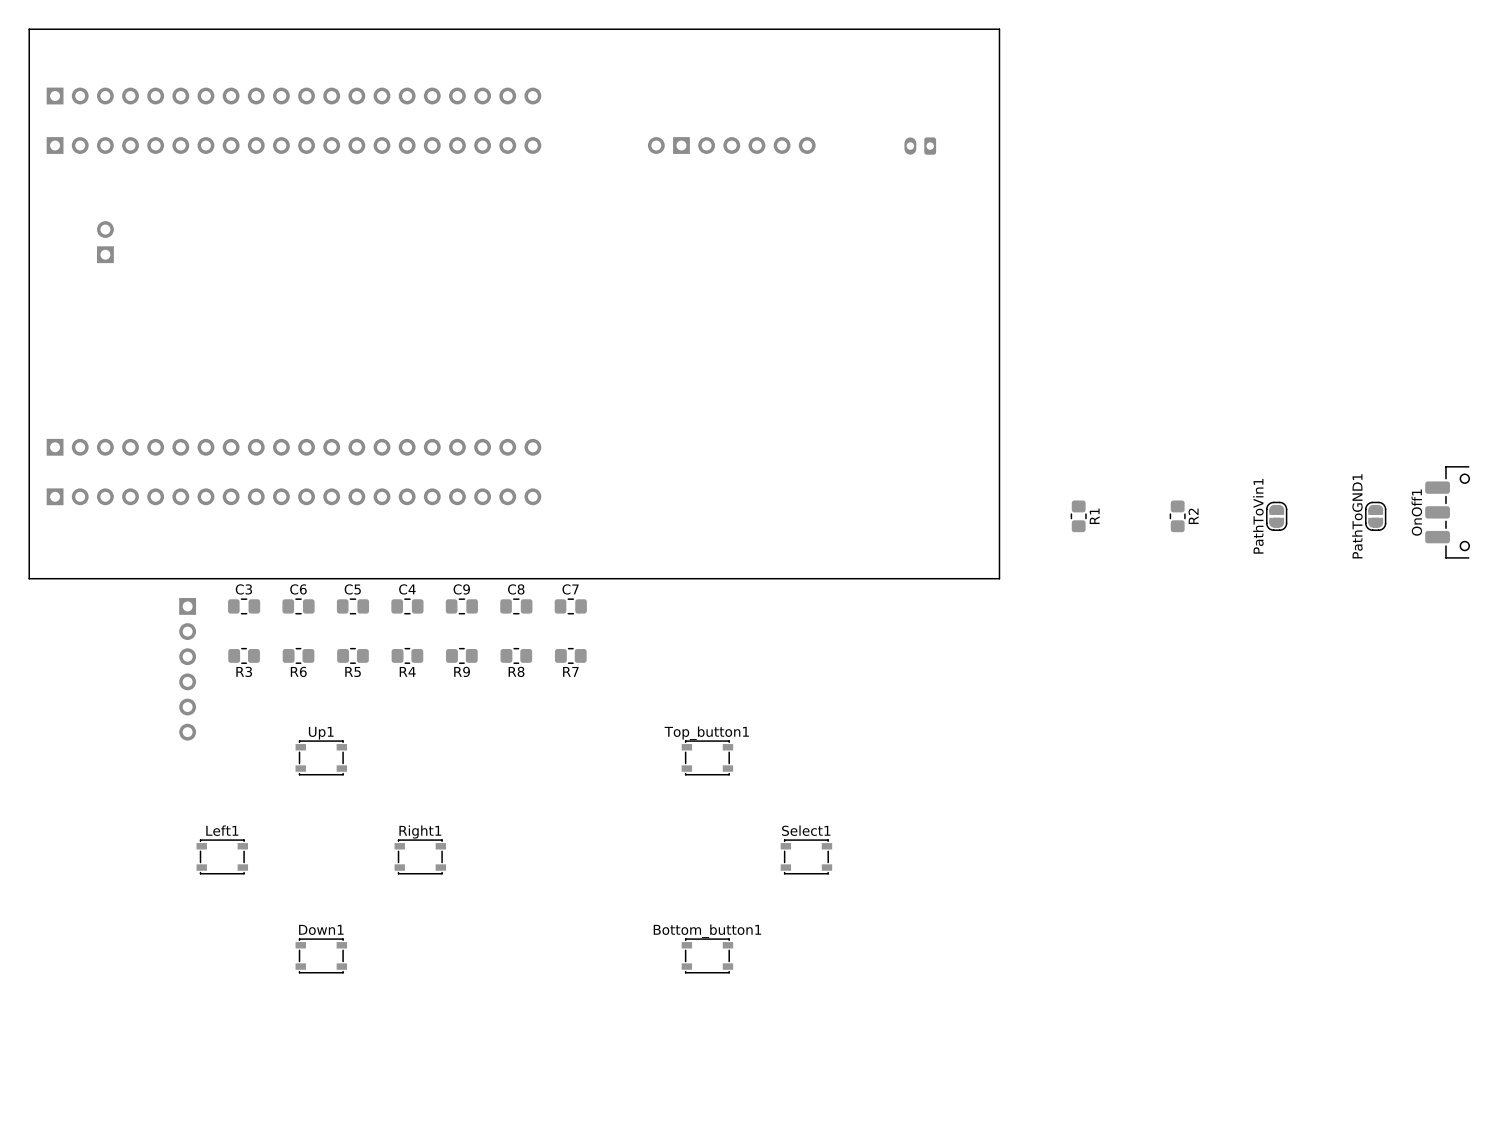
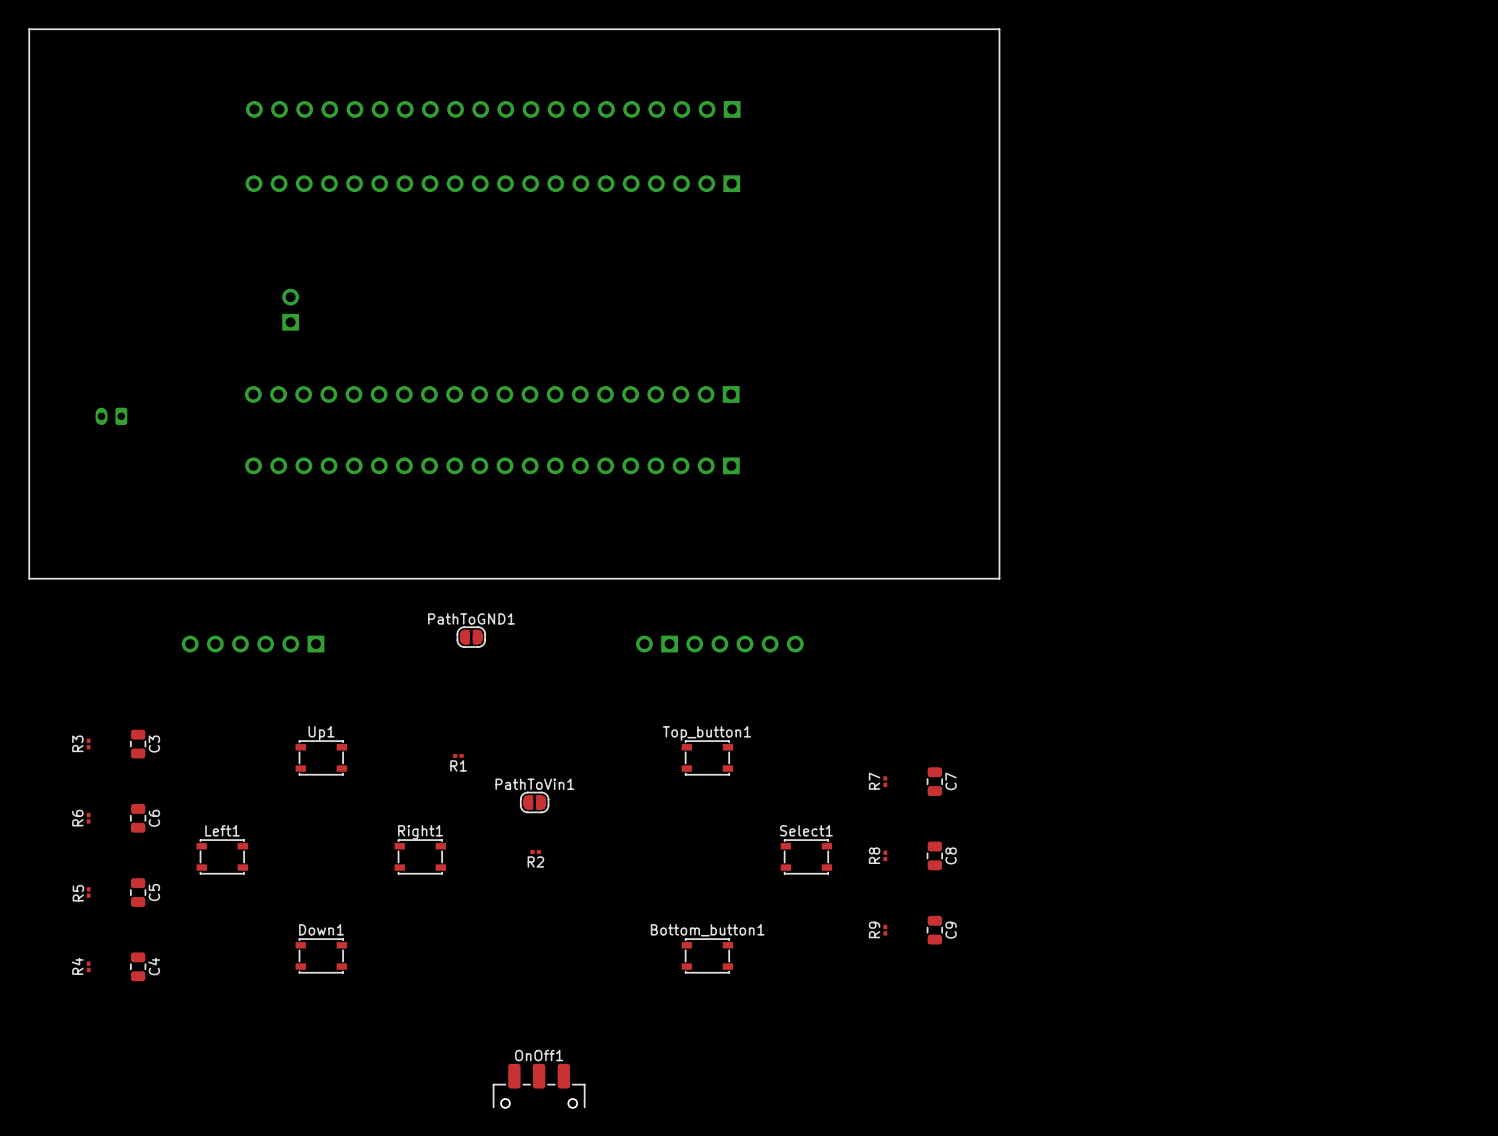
part: (293, 96) -> none
part: none -> (493, 109)
part: (293, 145) -> none
part: (731, 145) -> none
part: (920, 146) -> none
part: none -> (492, 183)
part position: (105, 242) -> (290, 309)
part: none -> (492, 394)
part: none -> (111, 416)
part: (293, 447) -> none
part: none -> (492, 465)
part: (293, 496) -> none
R1 footprint: [1070, 500, 1087, 533] -> [452, 753, 464, 758]
R2 footprint: [1169, 500, 1186, 533] -> [530, 849, 542, 854]
OnOff1 rotation: 0° (1447, 512) -> 90° clockwise (539, 1085)
OnOff1 position: (1447, 512) -> (539, 1085)
PathToVin1 rotation: 0° (1276, 516) -> 90° clockwise (534, 802)
PathToVin1 position: (1276, 516) -> (534, 802)
PathToGND1 rotation: 0° (1375, 516) -> 90° clockwise (471, 637)
PathToGND1 position: (1375, 516) -> (471, 637)
C3 name position: C3 (243, 589) -> C3 (154, 744)
C6 name position: C6 (298, 589) -> C6 (154, 818)
C5 name position: C5 (352, 589) -> C5 (154, 892)
C4 name position: C4 (407, 589) -> C4 (154, 966)
C9 name position: C9 (461, 589) -> C9 (951, 930)
C8 name position: C8 (516, 589) -> C8 (951, 855)
C7 name position: C7 (570, 589) -> C7 (951, 781)
C3 footprint: [227, 598, 261, 615] -> [130, 729, 147, 759]
C6 footprint: [282, 598, 315, 615] -> [130, 803, 147, 833]
C5 footprint: [336, 598, 370, 615] -> [130, 878, 147, 907]
C4 footprint: [391, 598, 424, 615] -> [130, 952, 147, 982]
C9 footprint: [445, 598, 478, 615] -> [926, 915, 943, 945]
C8 footprint: [500, 598, 533, 615] -> [926, 841, 943, 871]
C7 footprint: [554, 598, 587, 615] -> [926, 767, 943, 797]
part: none -> (719, 644)
R3 footprint: [228, 648, 260, 664] -> [86, 738, 91, 750]
R6 footprint: [282, 648, 315, 664] -> [86, 812, 91, 824]
R5 footprint: [337, 648, 369, 664] -> [86, 887, 91, 899]
R4 footprint: [391, 648, 424, 664] -> [86, 961, 91, 973]
R9 footprint: [446, 648, 478, 664] -> [883, 924, 888, 936]
R8 footprint: [500, 648, 533, 664] -> [883, 850, 888, 862]
R7 footprint: [554, 648, 587, 664] -> [883, 776, 888, 788]
part rotation: 0° (187, 669) -> 90° clockwise (253, 644)

